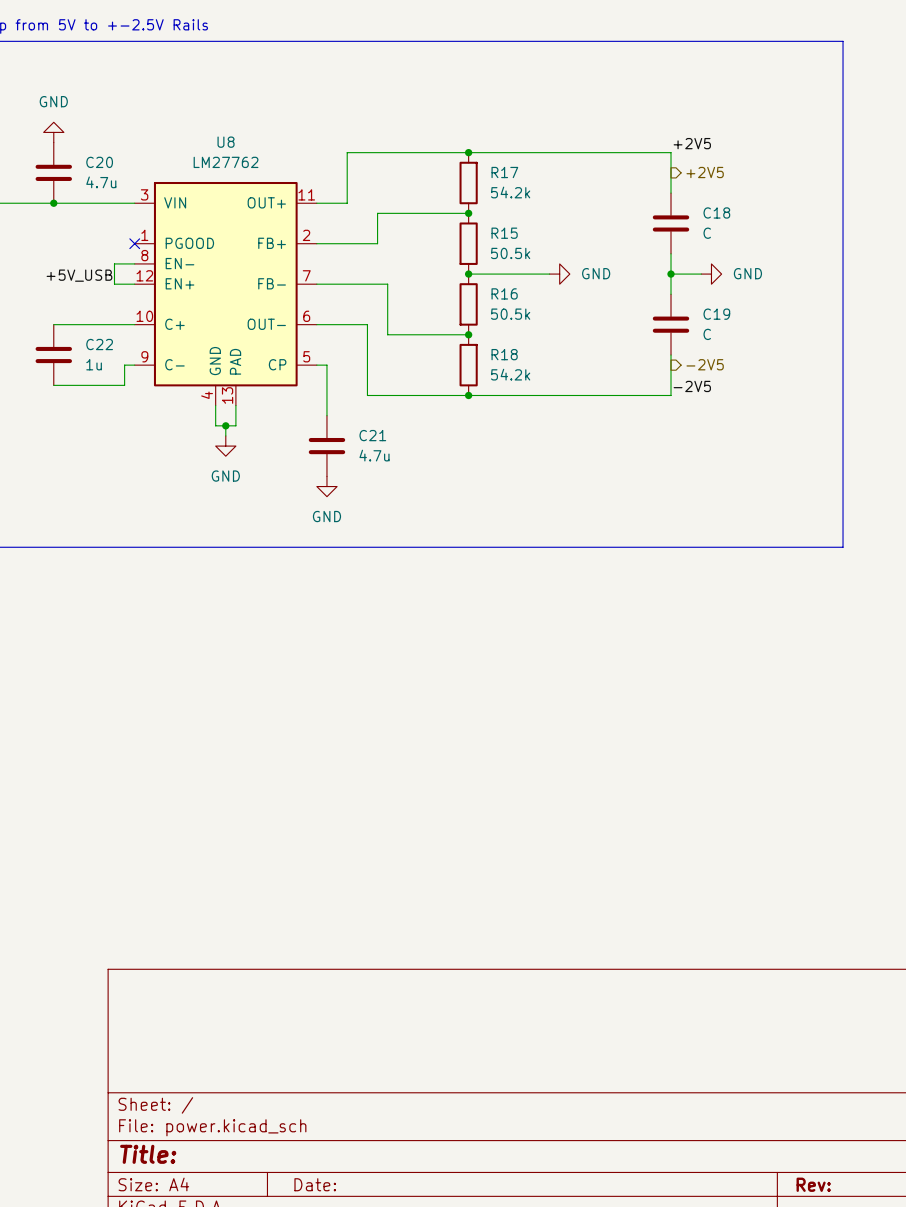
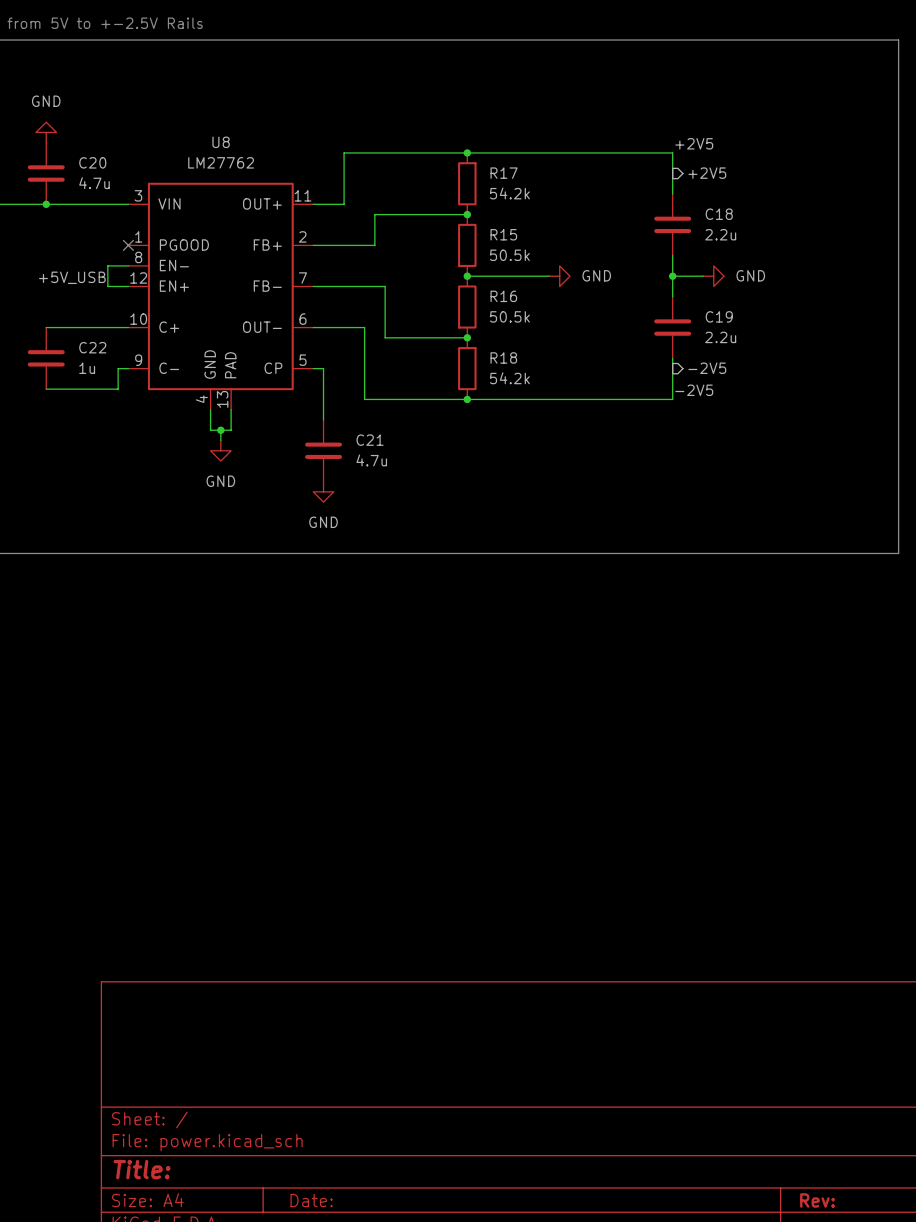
line: (843, 41) (843, 547) -> (847, 40) (898, 40) (898, 553) (847, 553)
C18 value: C (707, 233) -> 2.2u (720, 234)
C19 value: C (707, 334) -> 2.2u (720, 337)

